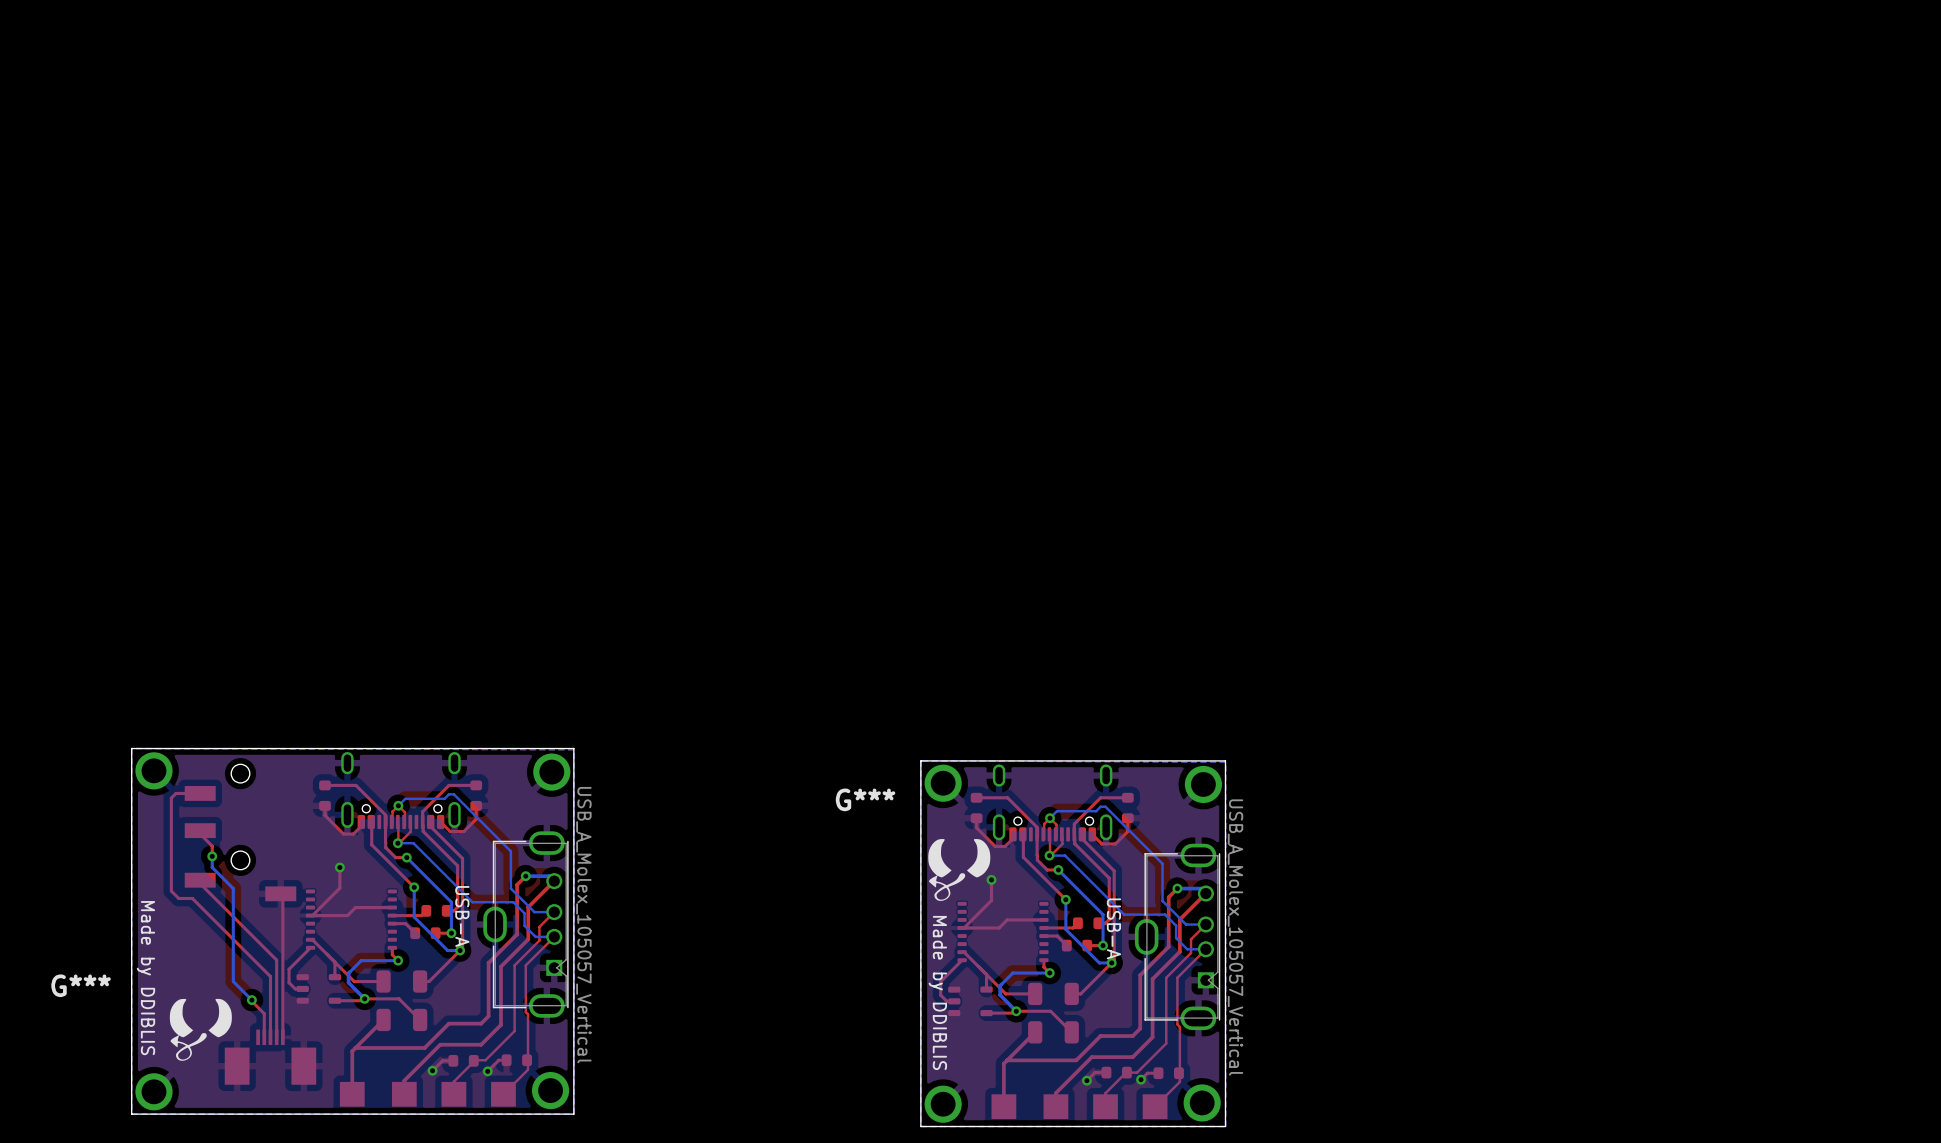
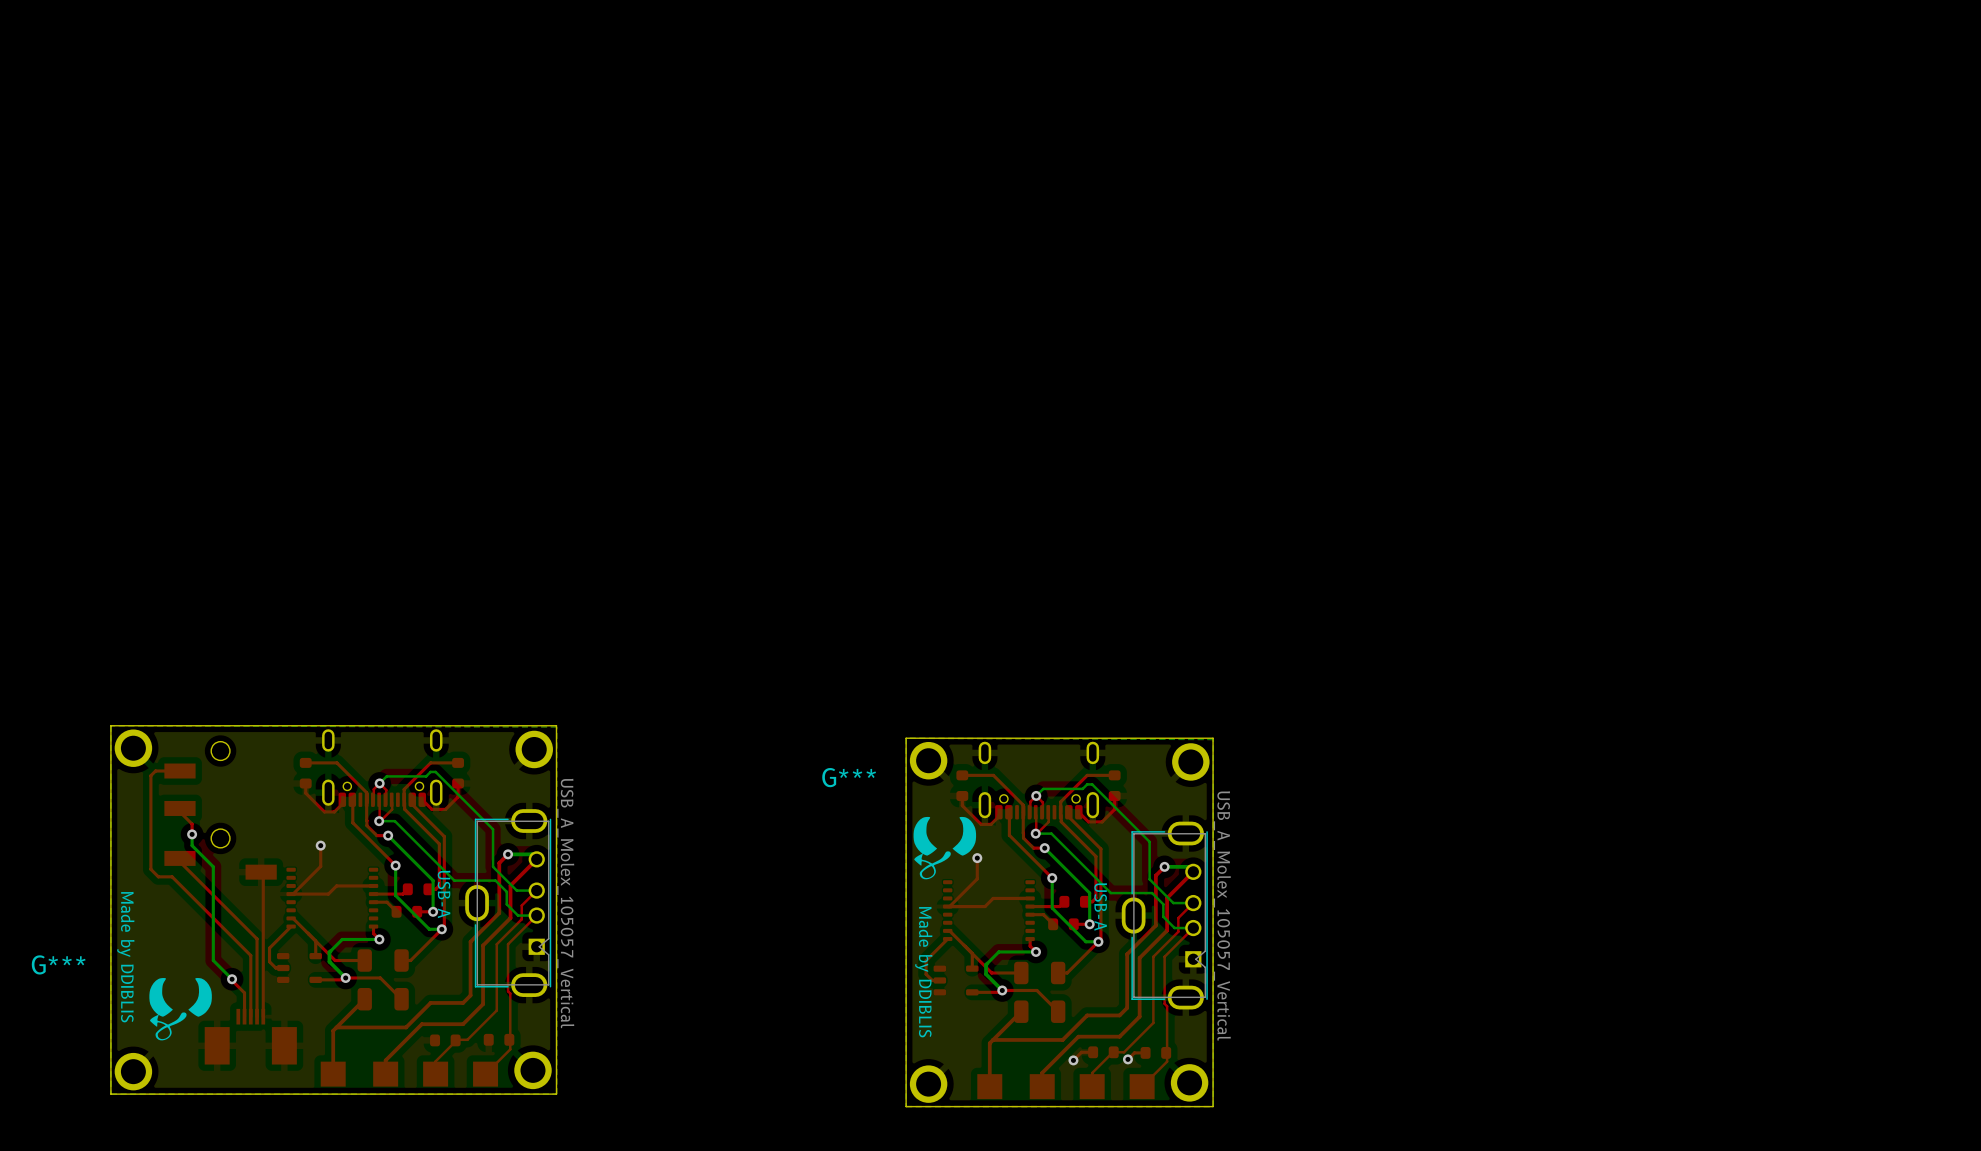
top track: (453, 1060) (442, 1060) (432, 1070) -> none
top track: (506, 1060) (498, 1060) (487, 1071) -> none
via: (432, 1070) -> none
via: (487, 1071) -> none

